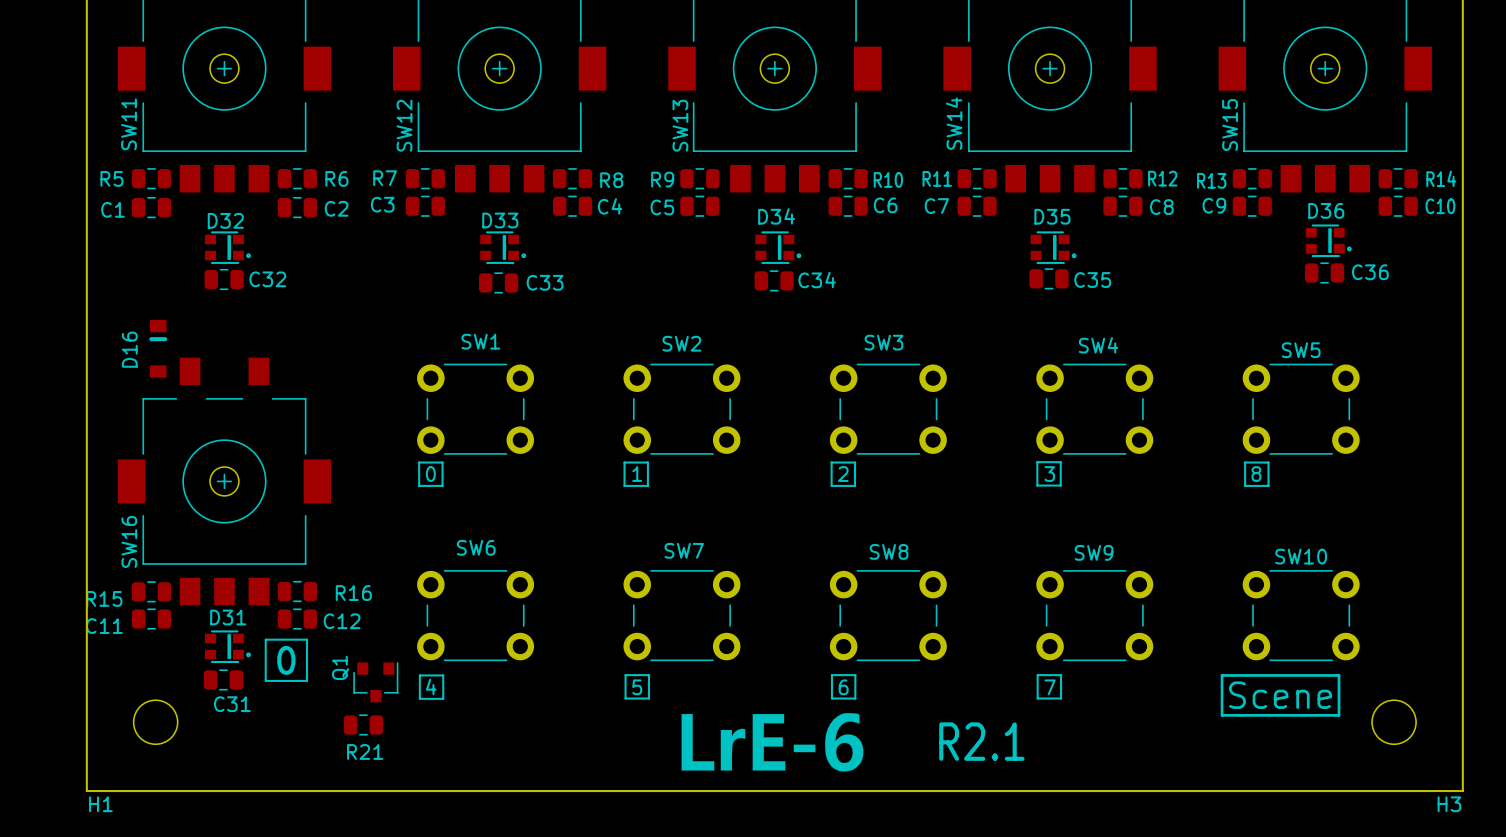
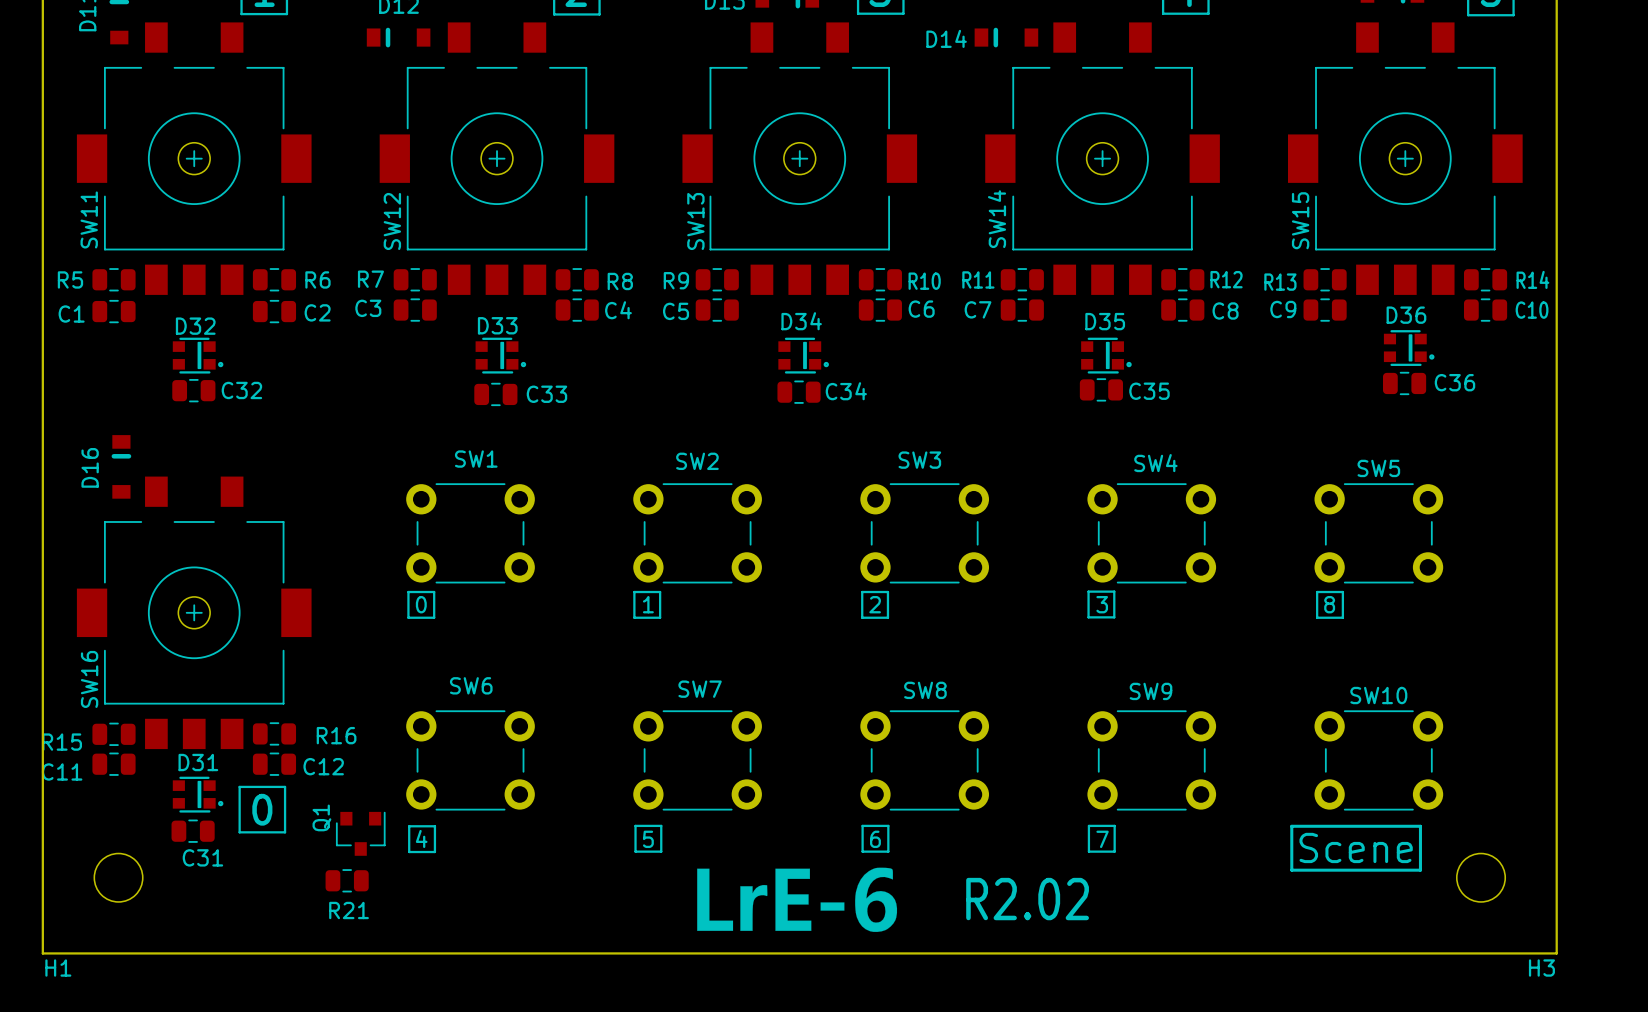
text: R2.1 (981, 741) -> R2.02 (1027, 899)

